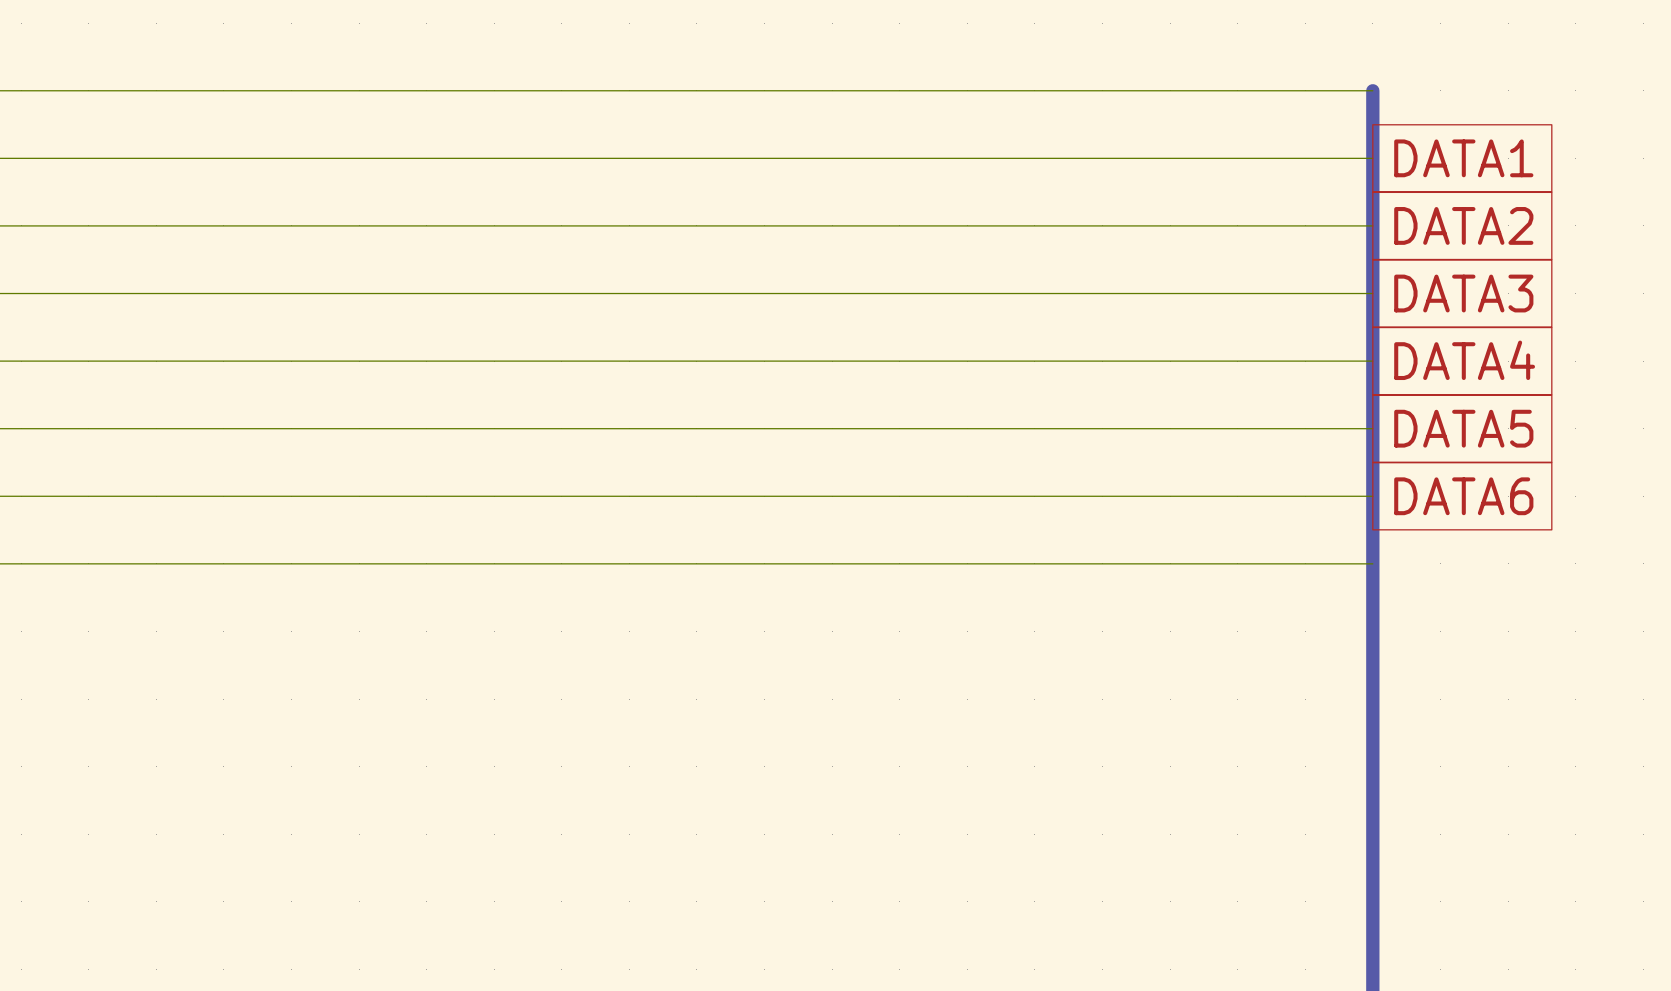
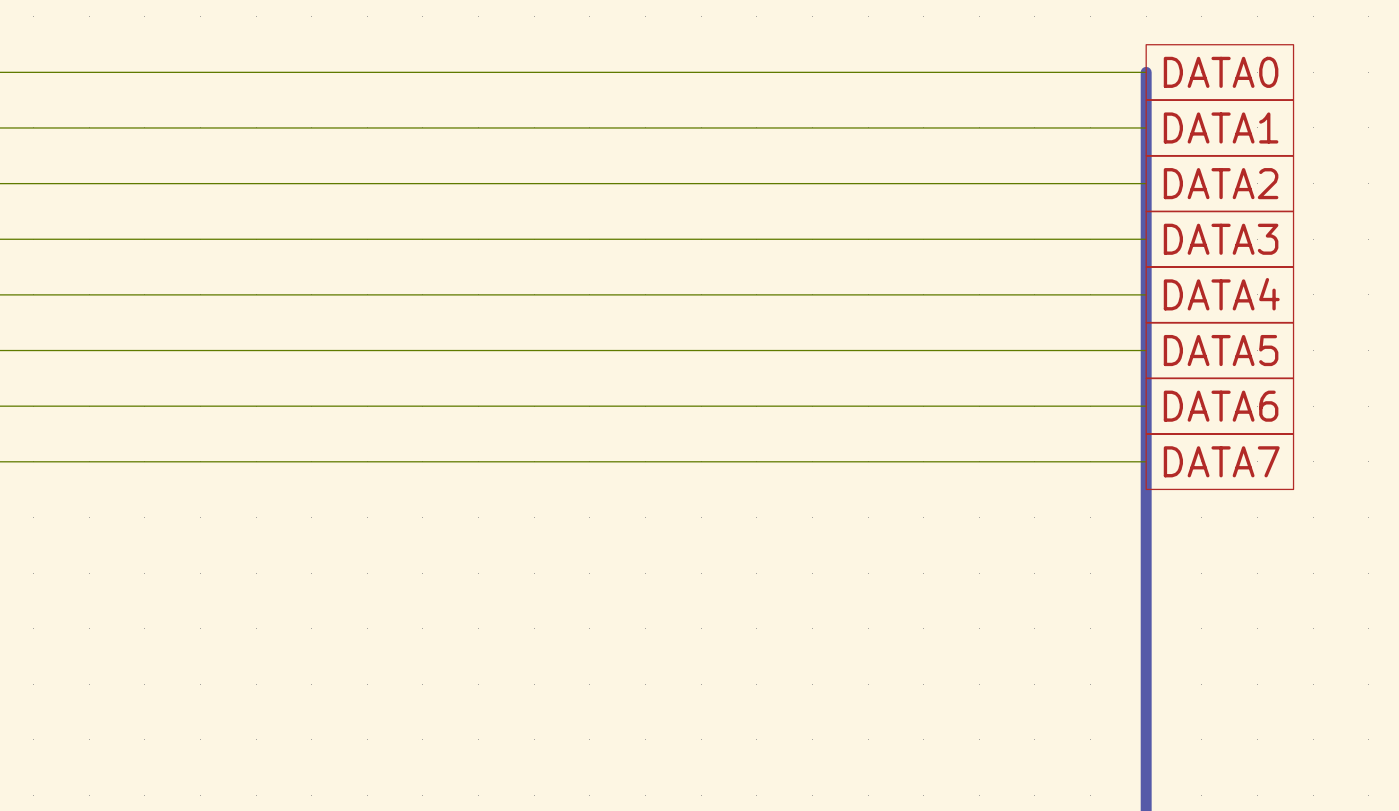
global label: none -> DATA0 (1221, 72)
global label: none -> DATA7 (1221, 461)

